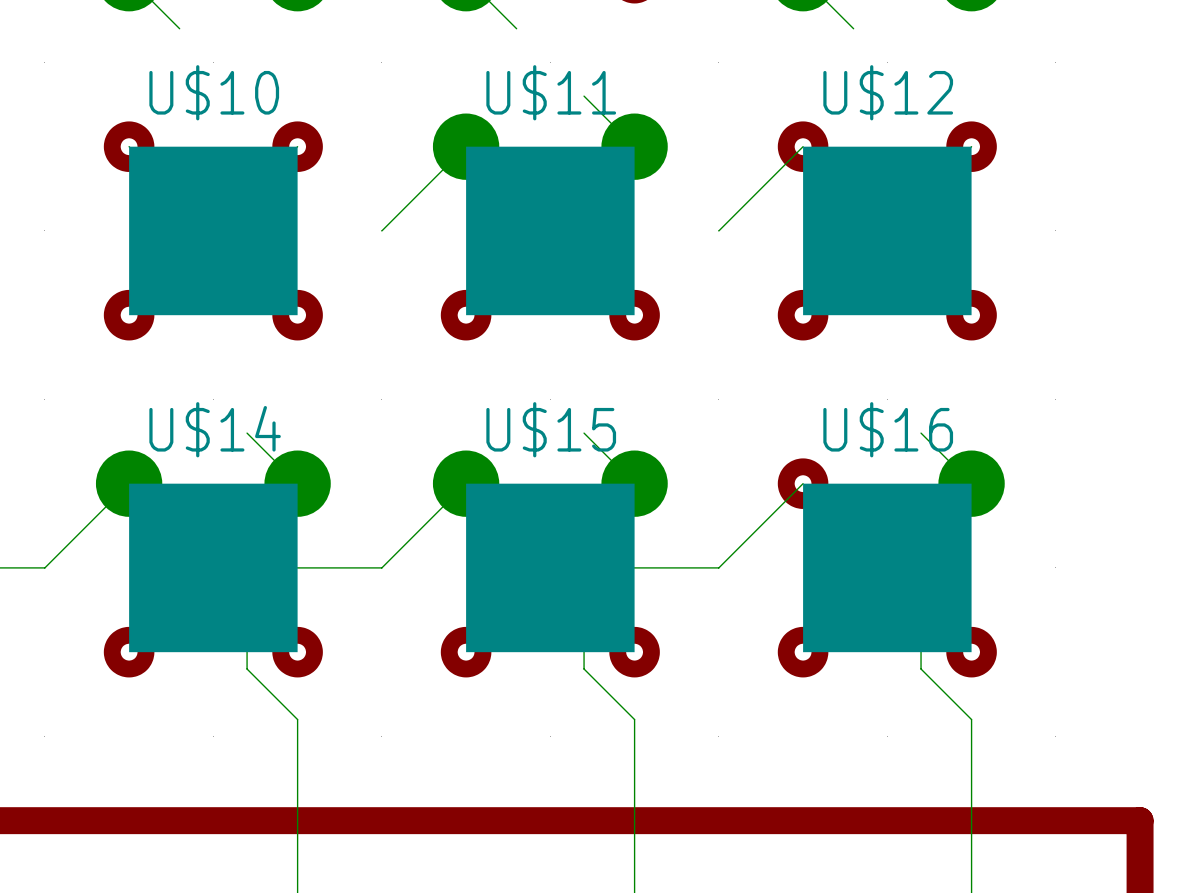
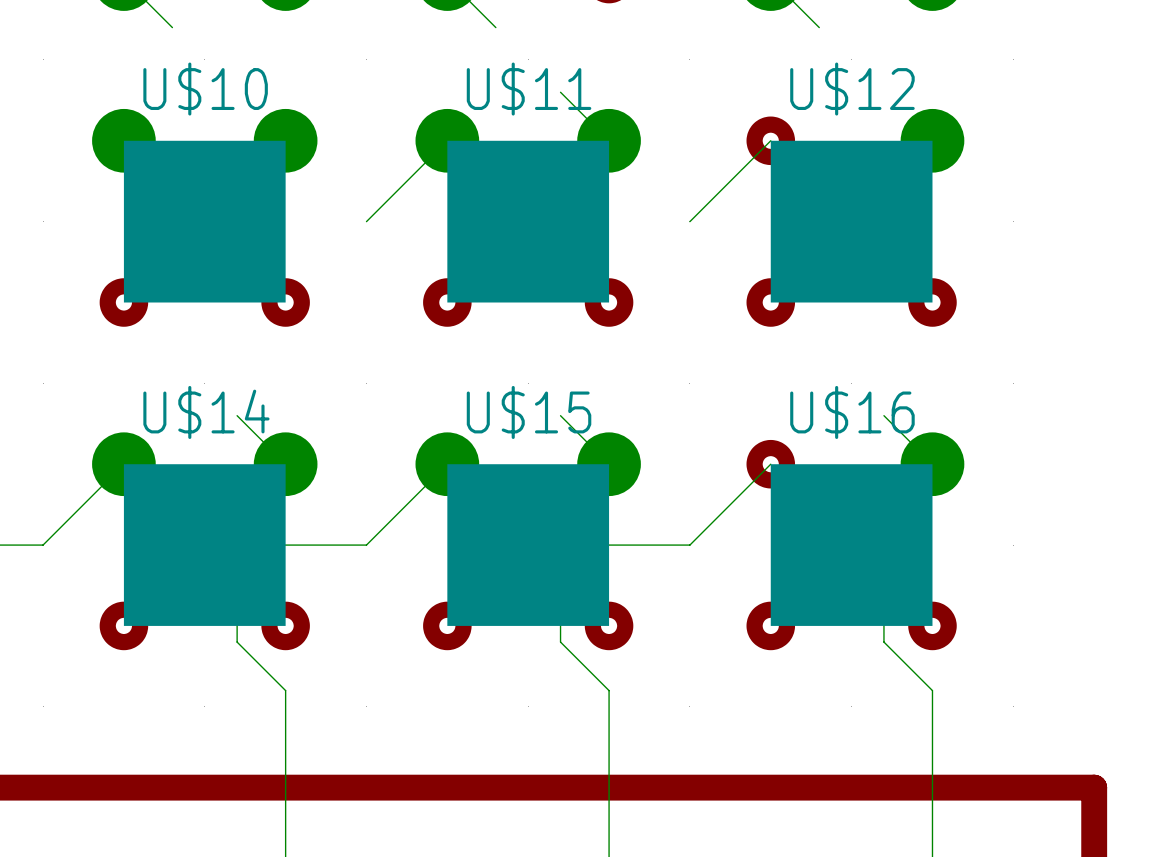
junction: none -> (123, 140)
junction: none -> (285, 140)
junction: none -> (932, 140)

